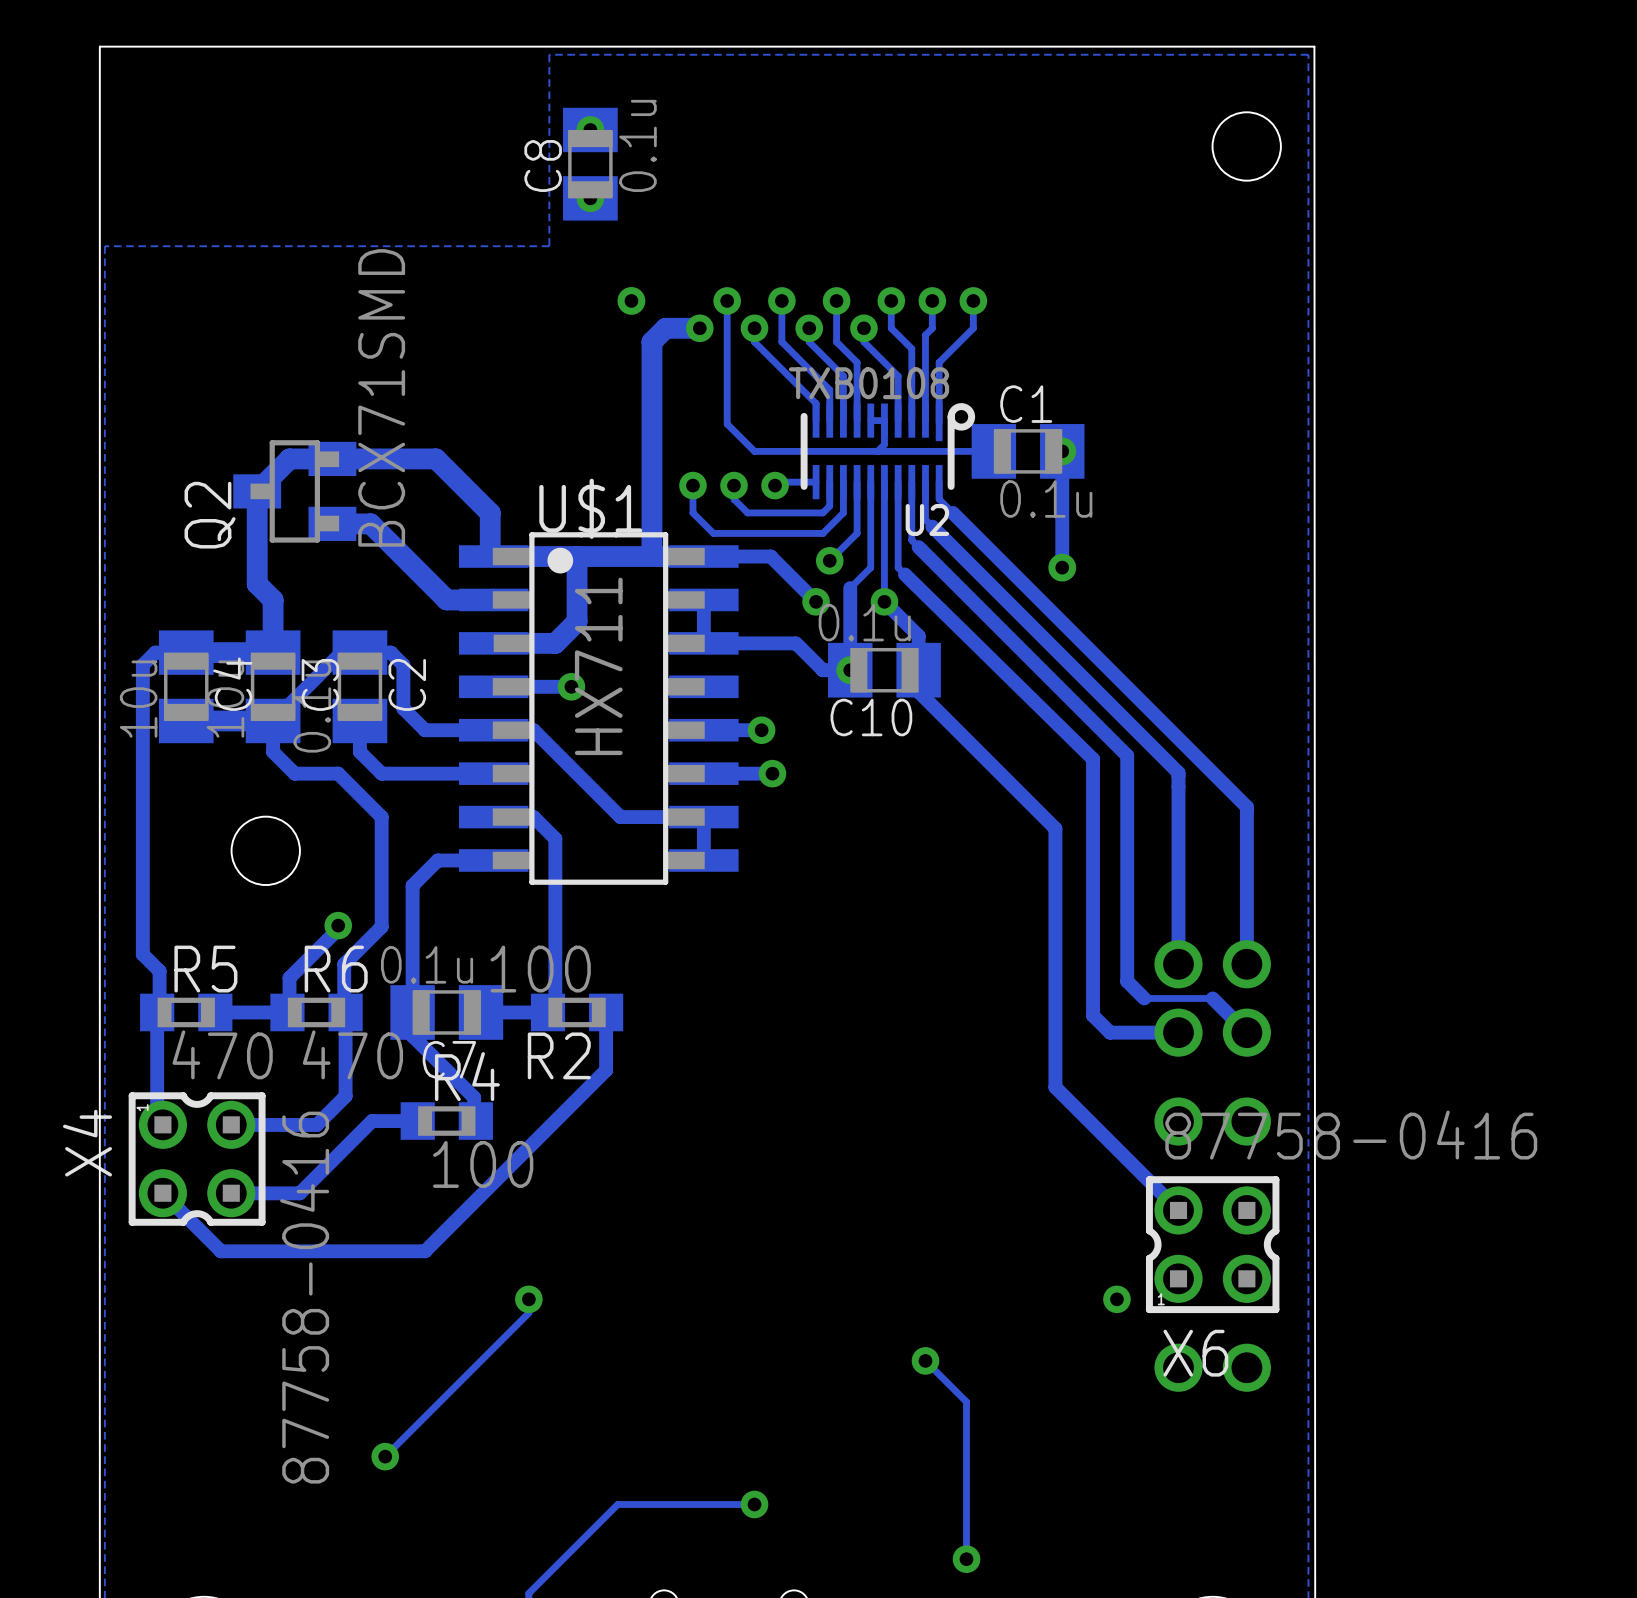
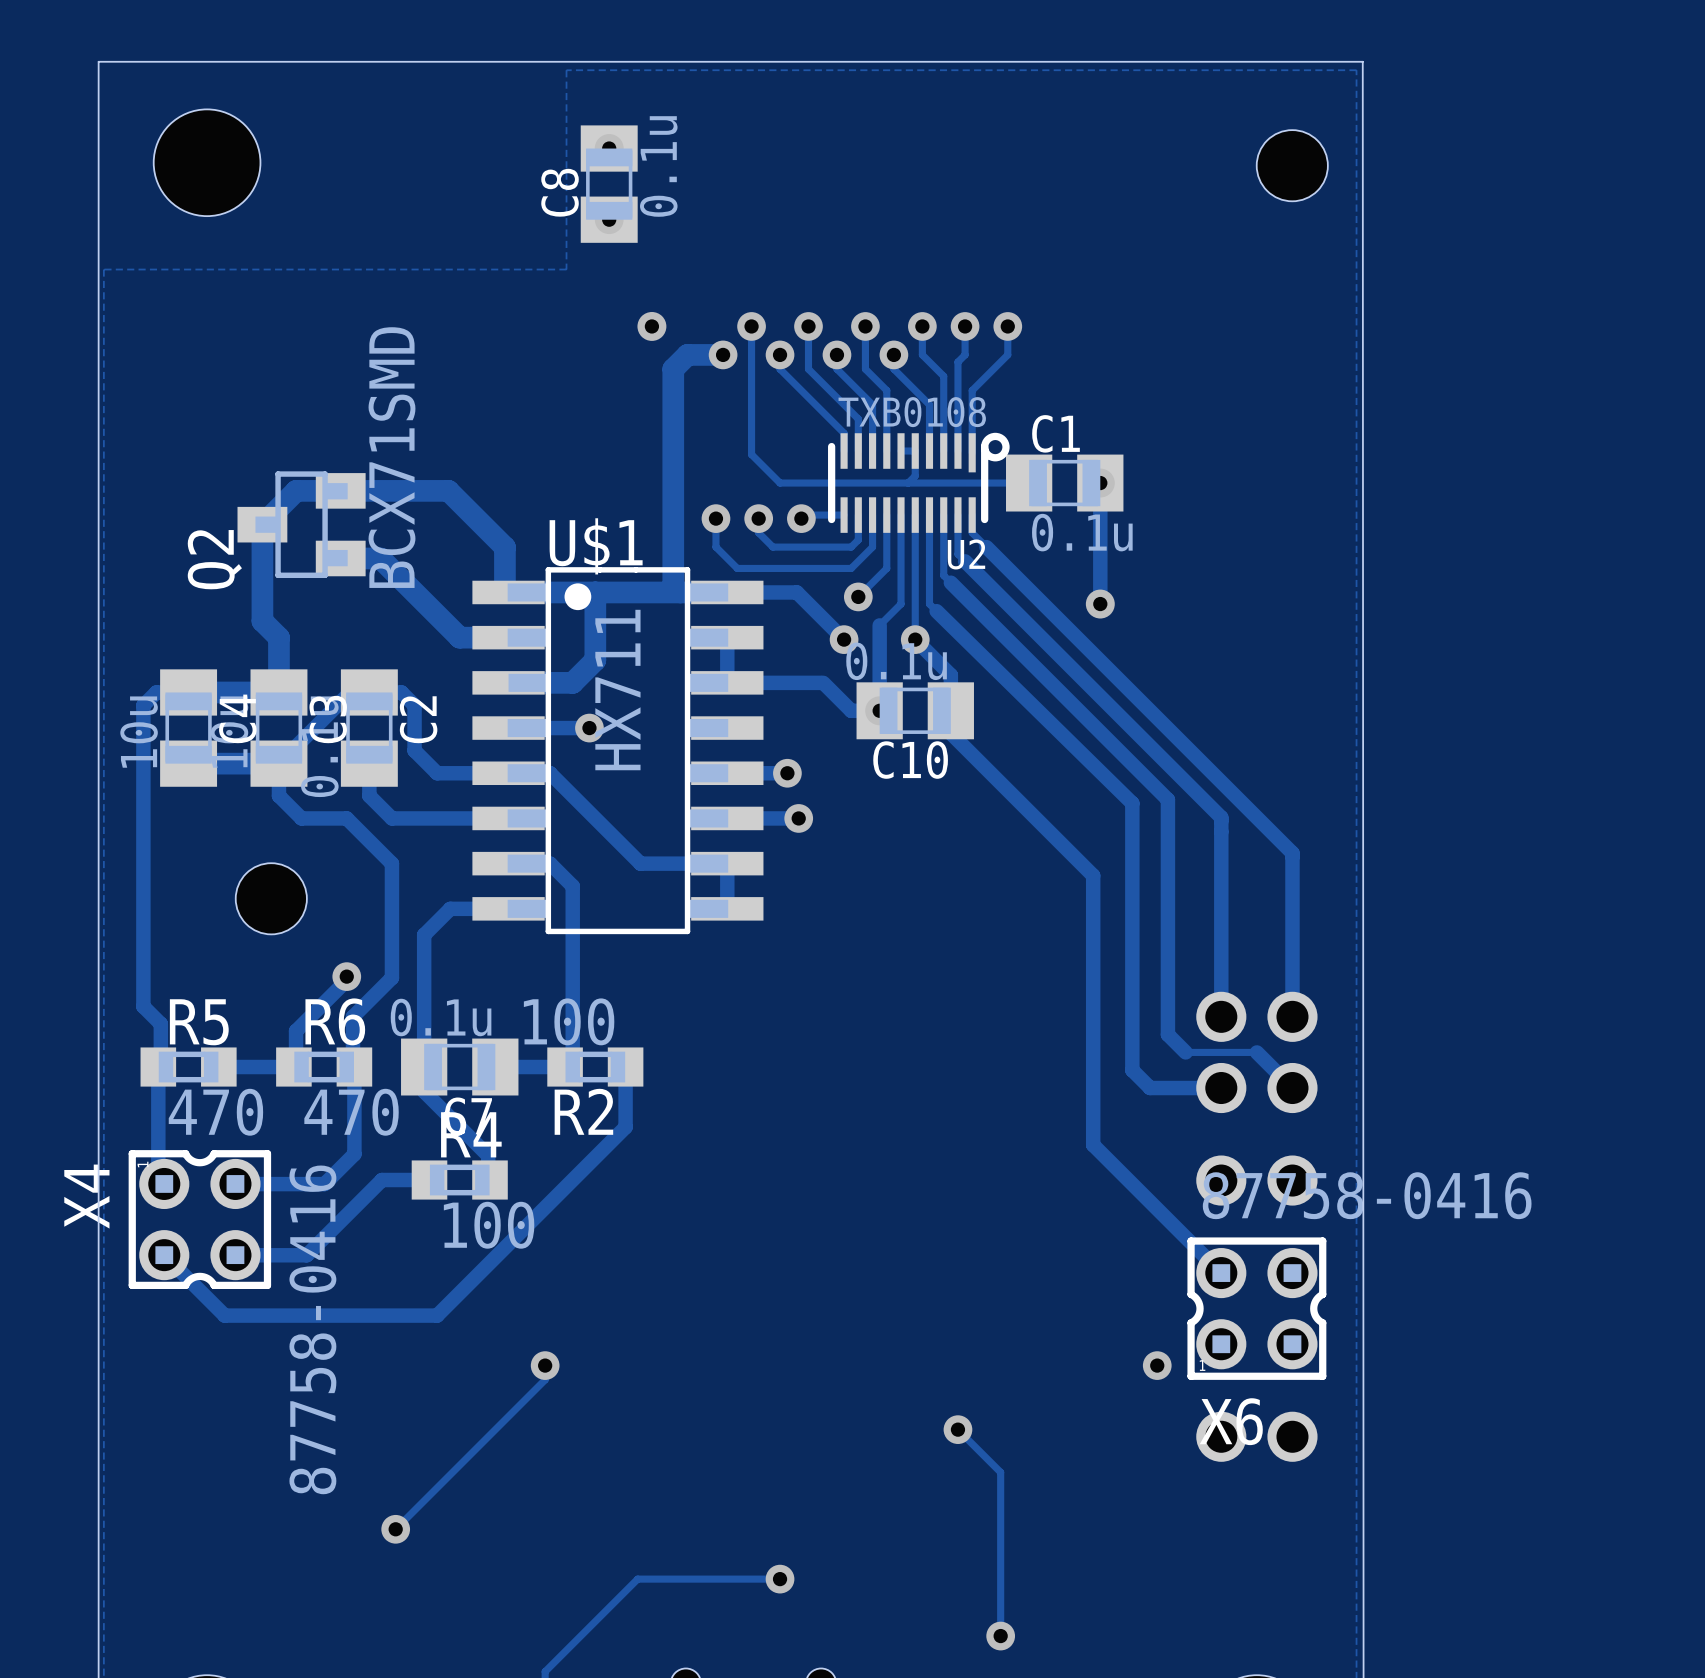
hole: none -> (207, 162)

